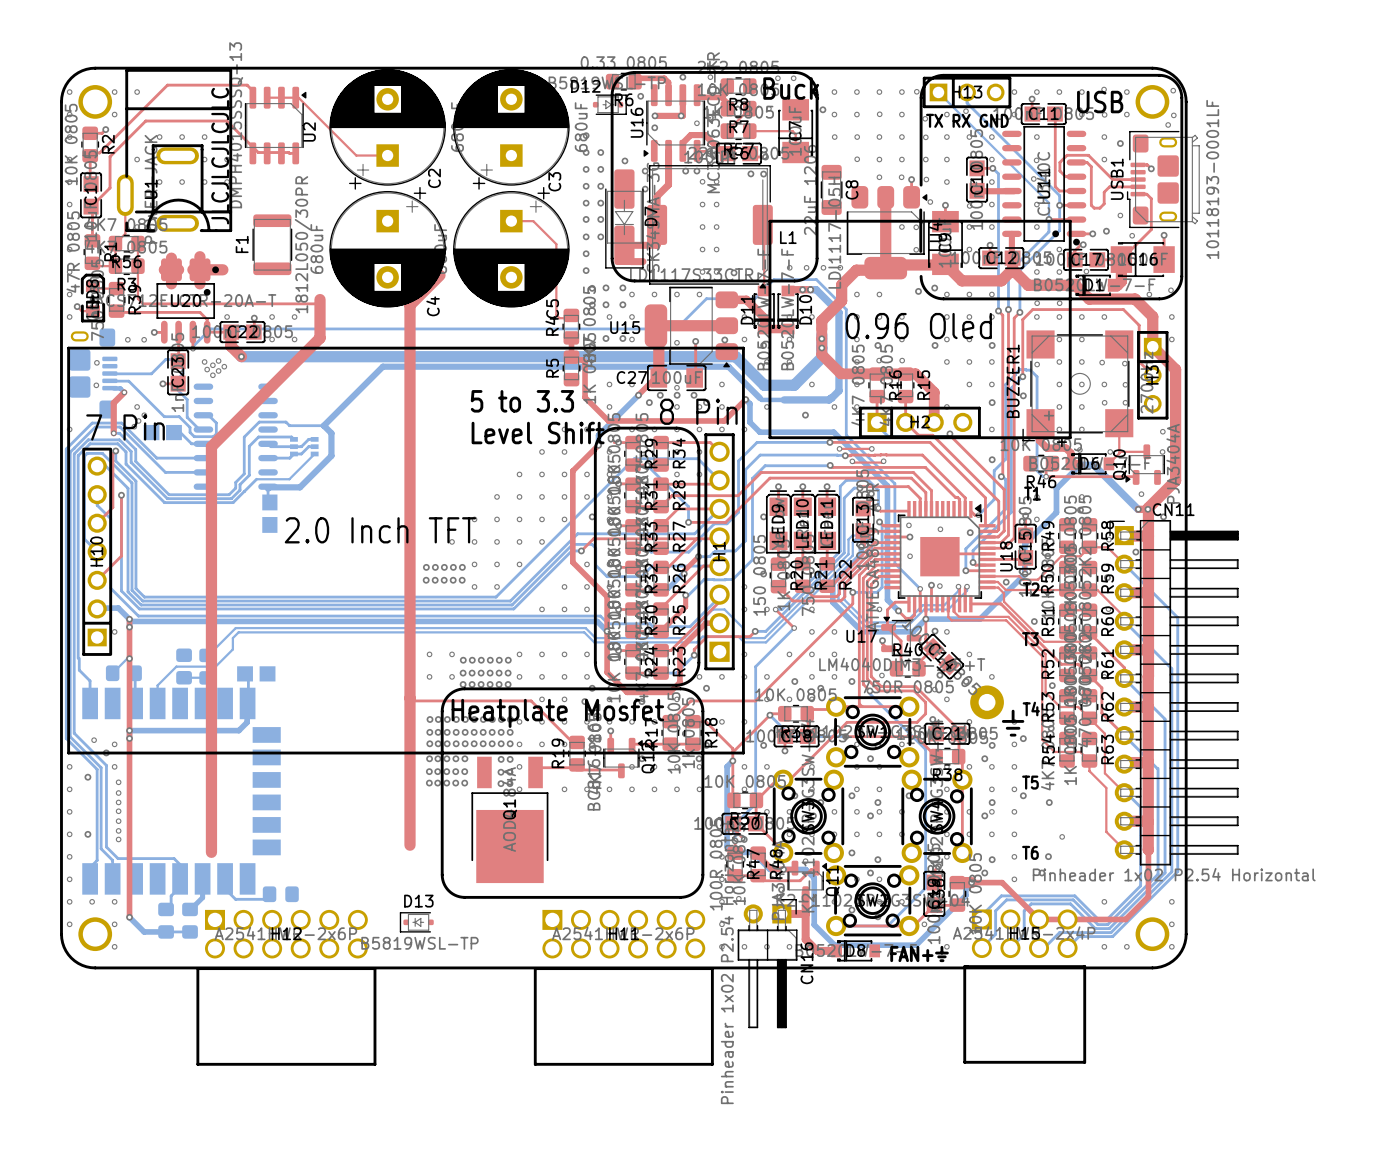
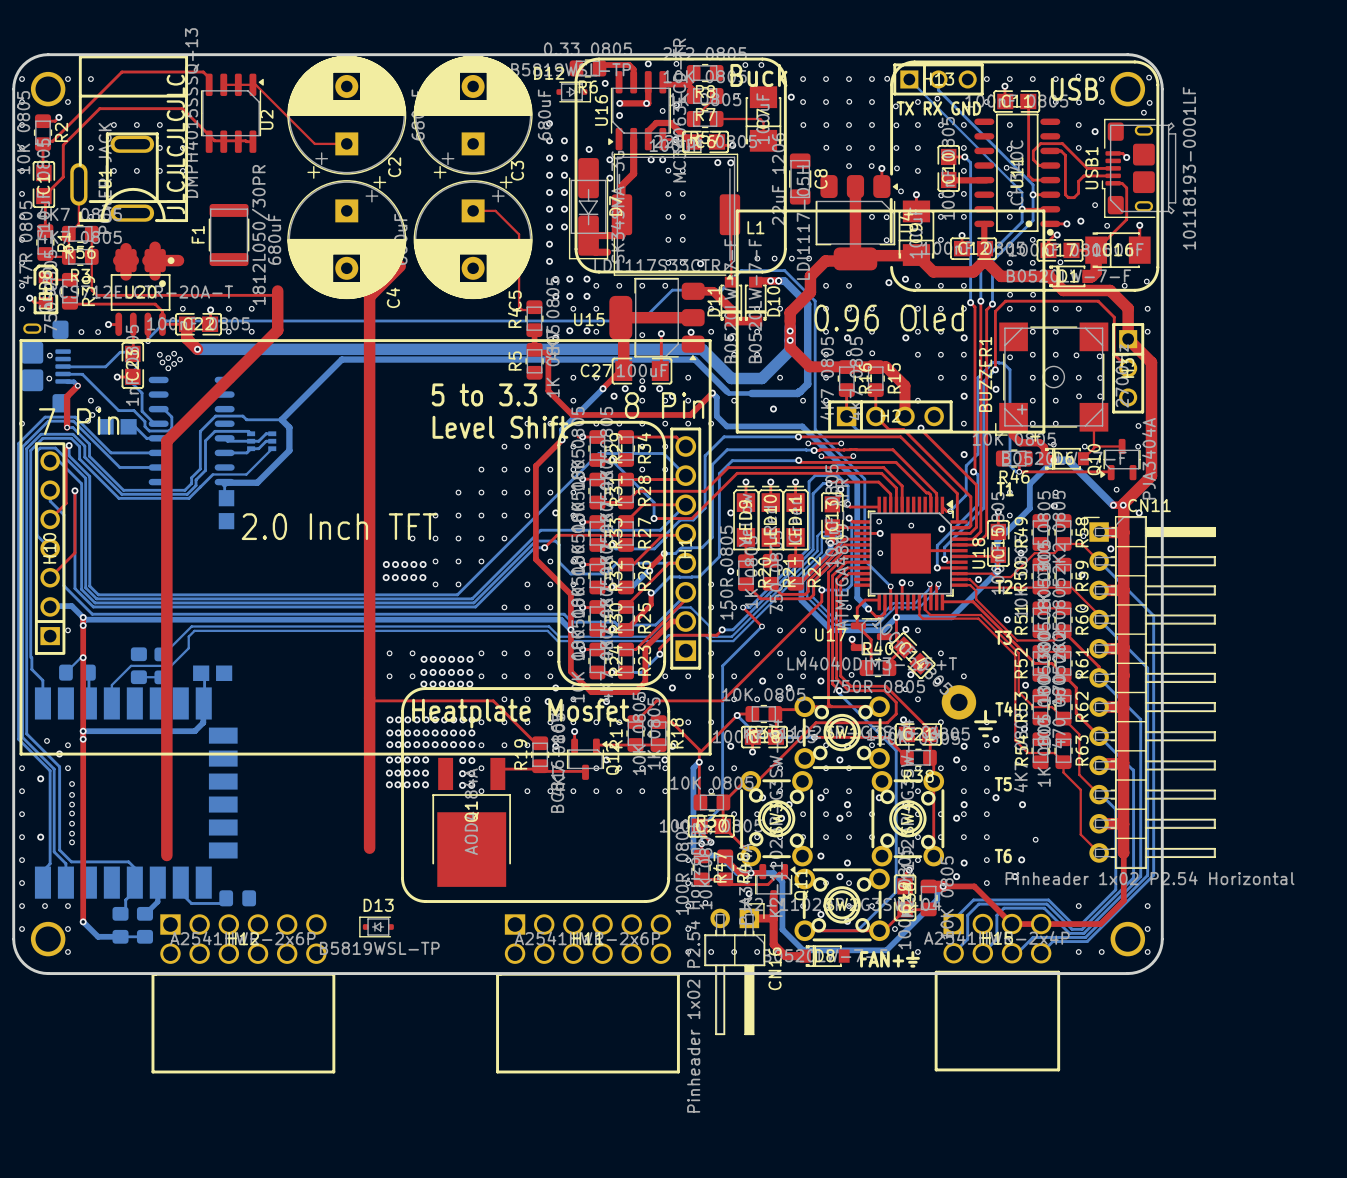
R20 value: 150 0805 (759, 575) -> 150R 0805 (726, 572)

